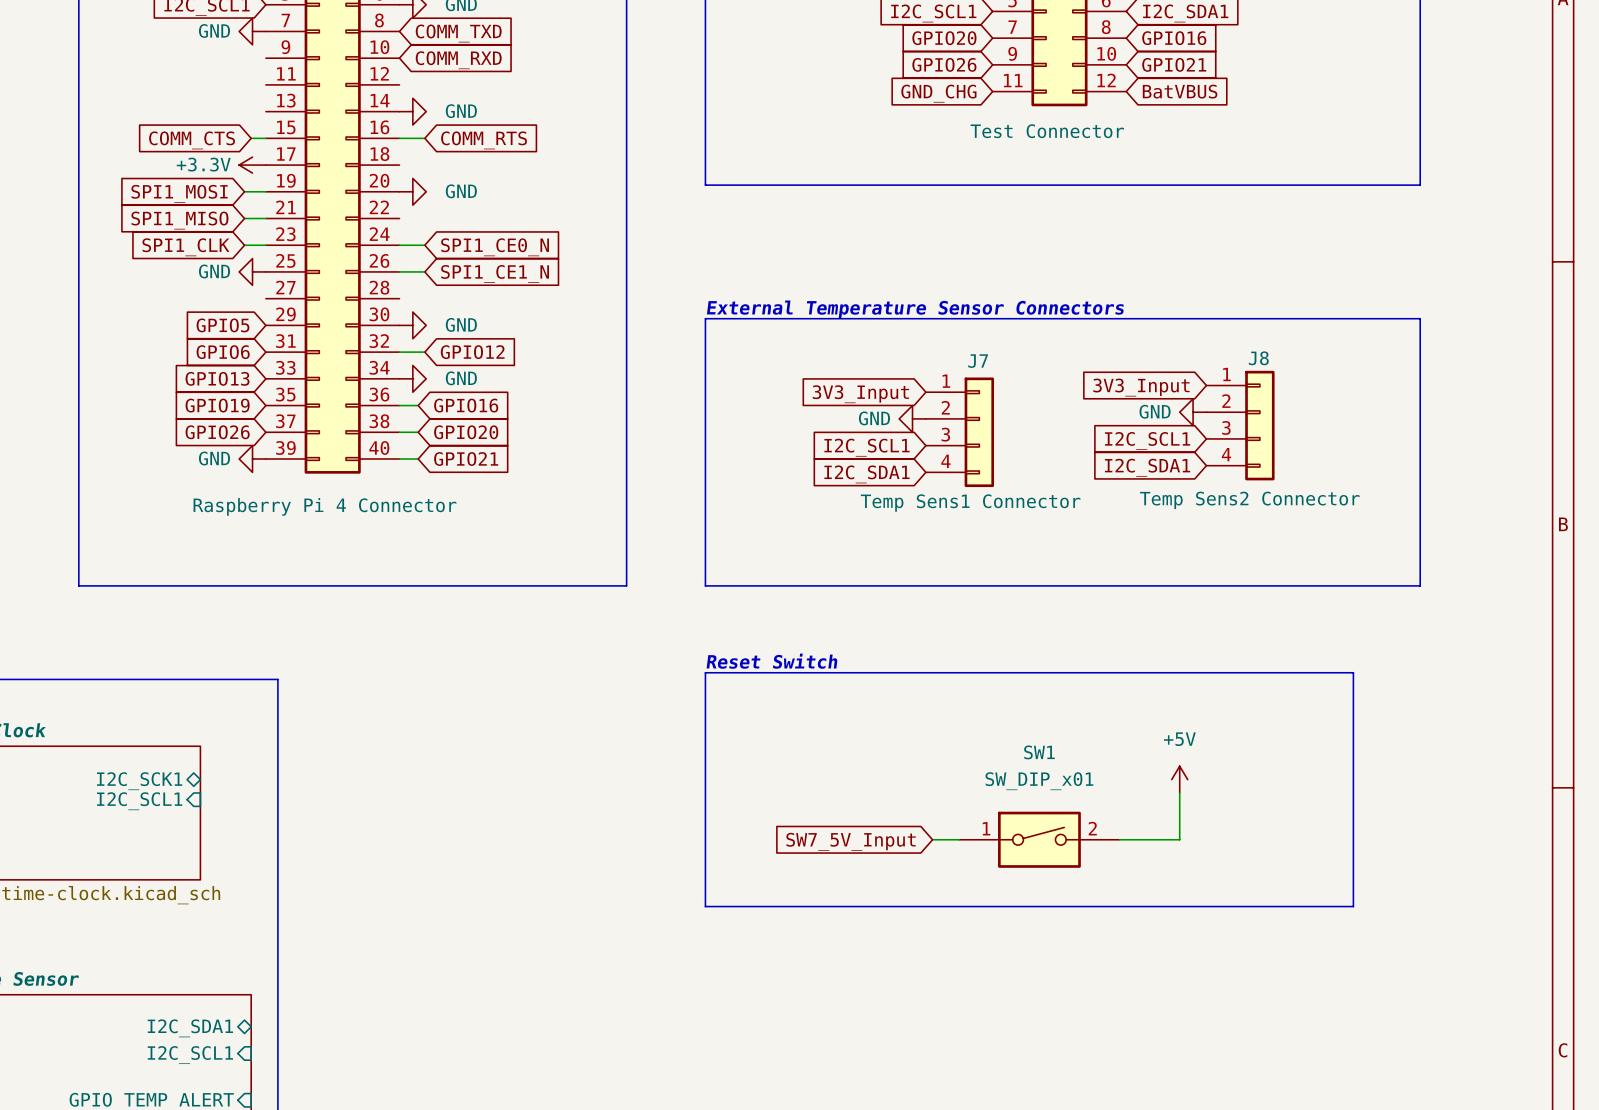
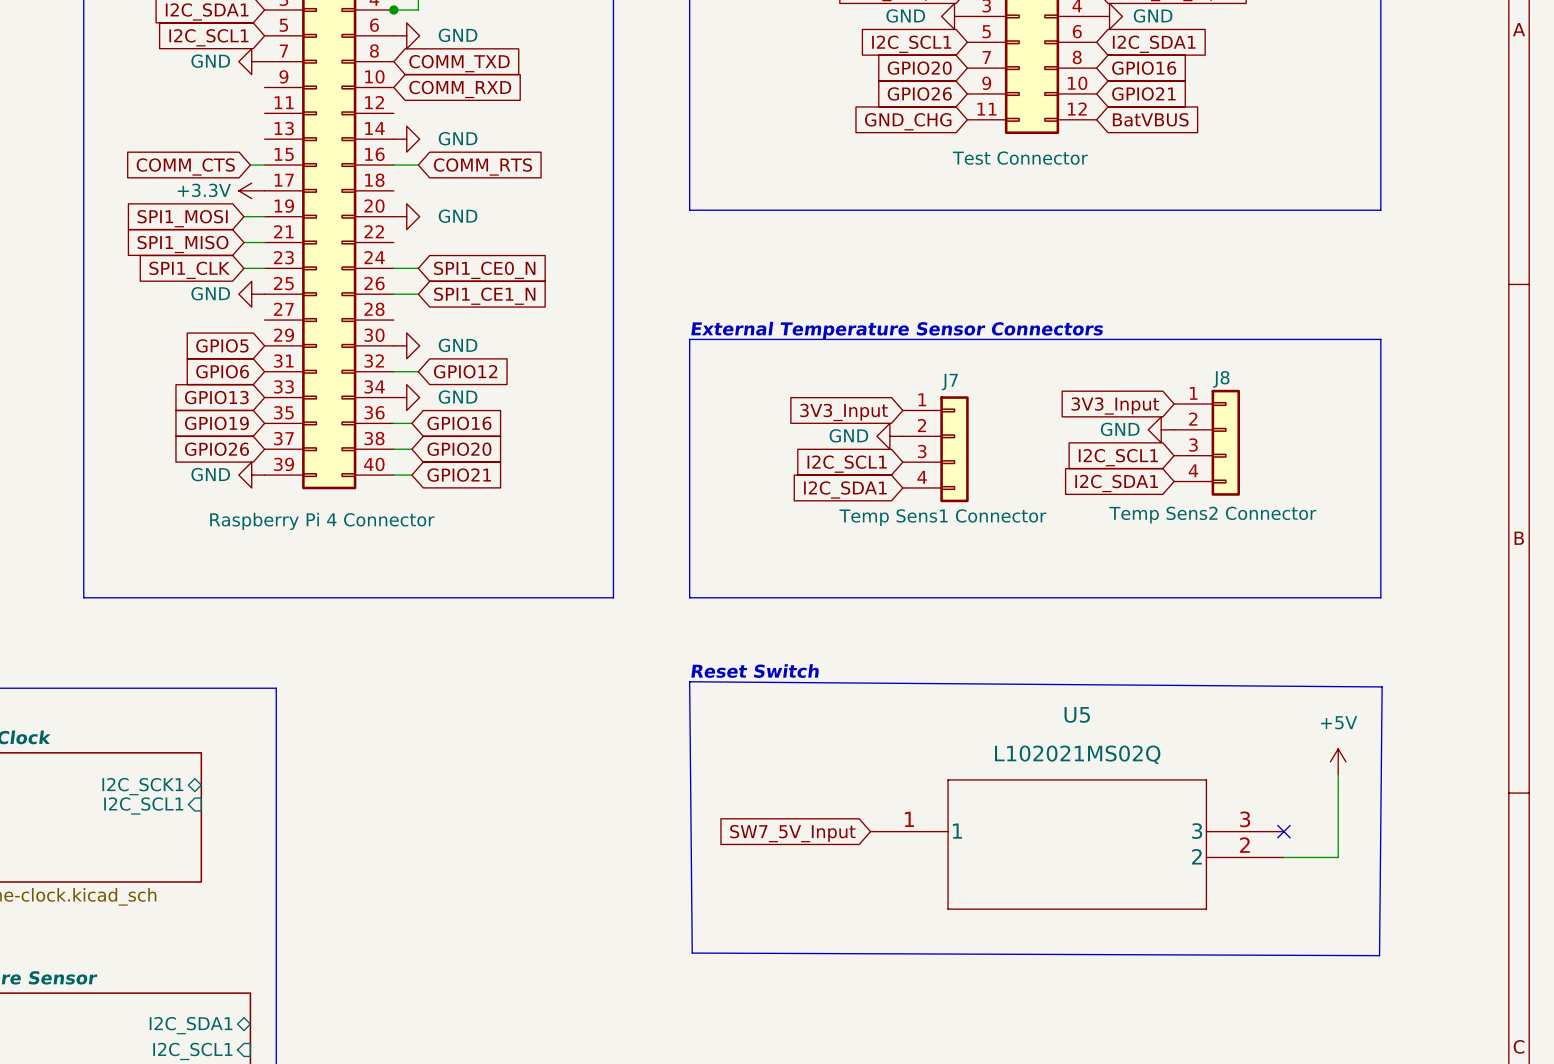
line: (705, 672) (1353, 672) (1353, 906) (705, 906) (705, 672) -> (689, 681) (692, 953) (1379, 955) (1382, 686) (689, 681)
wire: none -> (1338, 774) (1338, 857) (1283, 857)
power symbol position: +5V (1179, 779) -> +5V (1338, 761)
wire: (1179, 793) (1179, 839) (1119, 839) -> none
no-connect mark: none -> (1283, 831)
wire: (932, 839) (959, 839) -> none
SW1: SW_DIP_x01 (1039, 839) -> none
global label position: SW7_5V_Input (851, 841) -> SW7_5V_Input (792, 833)
U5: none -> L102021MS02Q (1077, 844)

